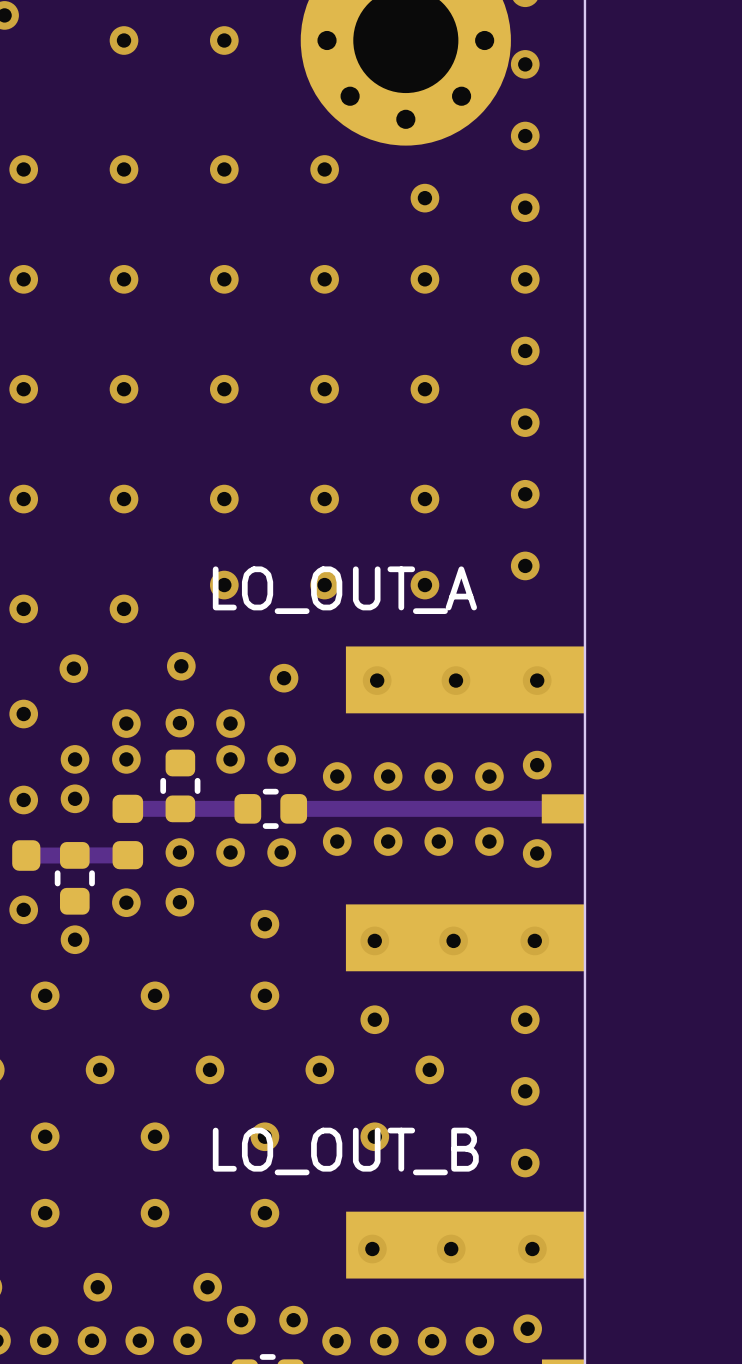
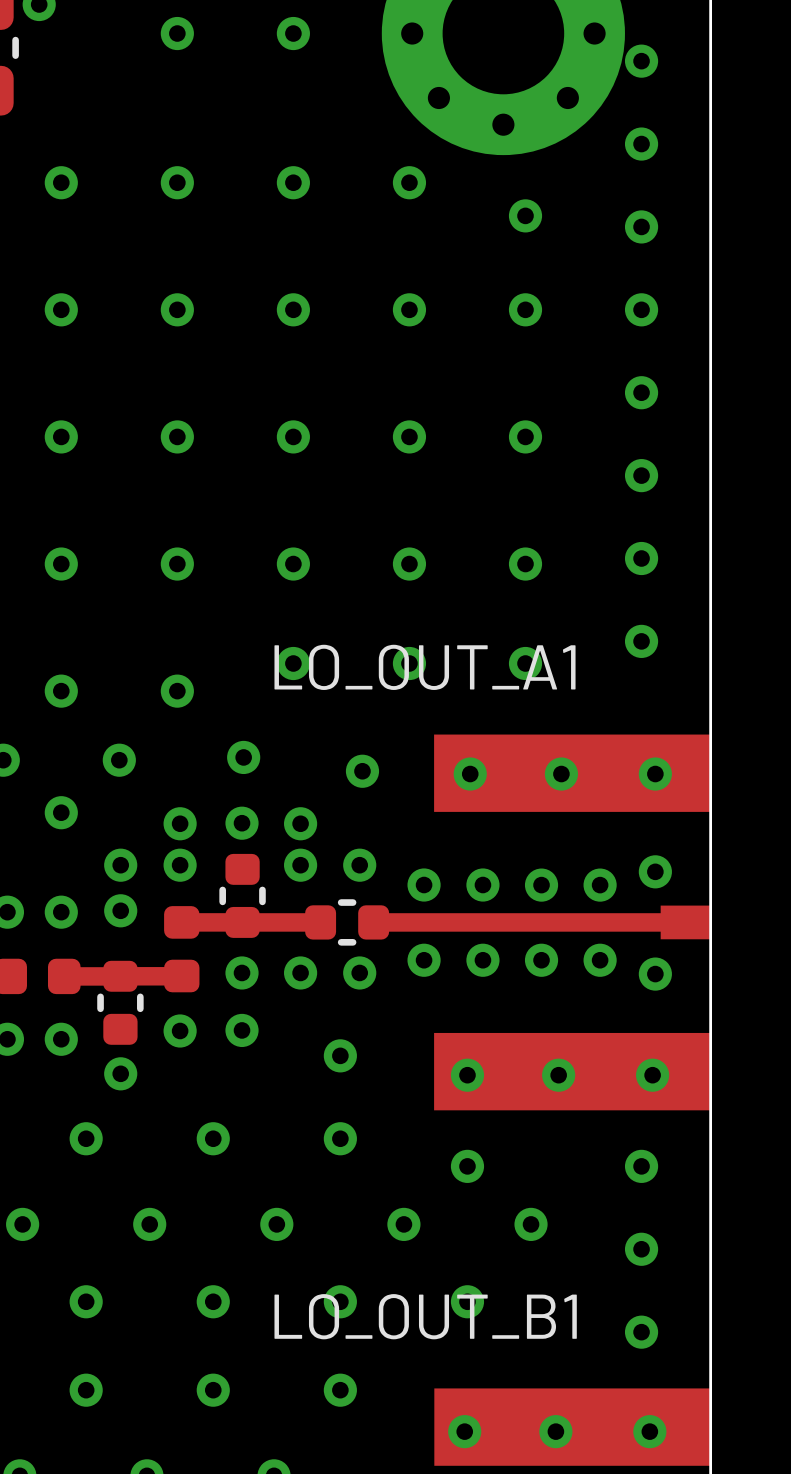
LO_OUT_A name: LO_OUT_A (344, 590) -> LO_OUT_A1 (425, 667)
LO_OUT_B name: LO_OUT_B (345, 1151) -> LO_OUT_B1 (425, 1316)

